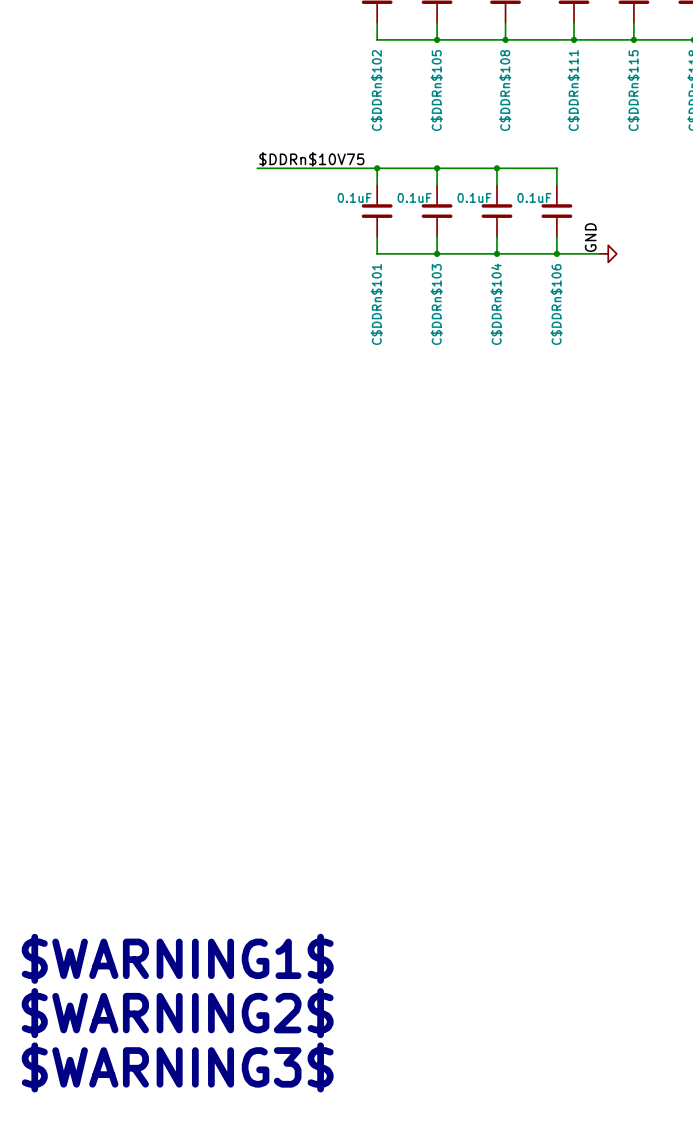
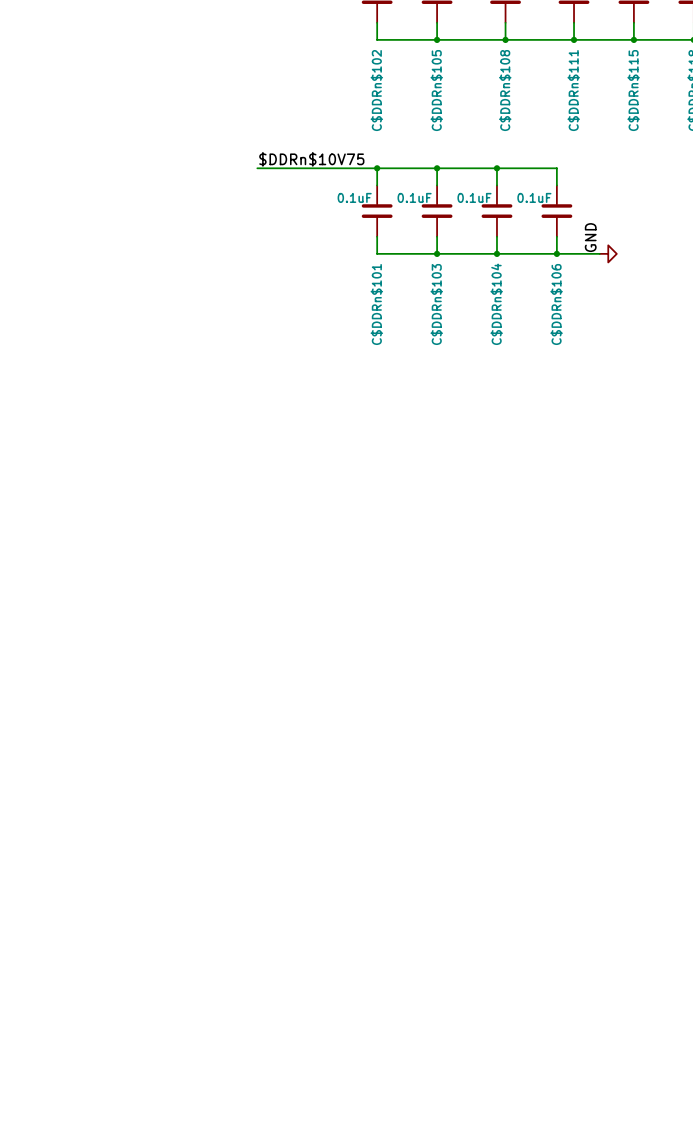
text: $WARNING1$ (177, 958) -> none
text: $WARNING2$ (177, 1013) -> none
text: $WARNING3$ (177, 1067) -> none

